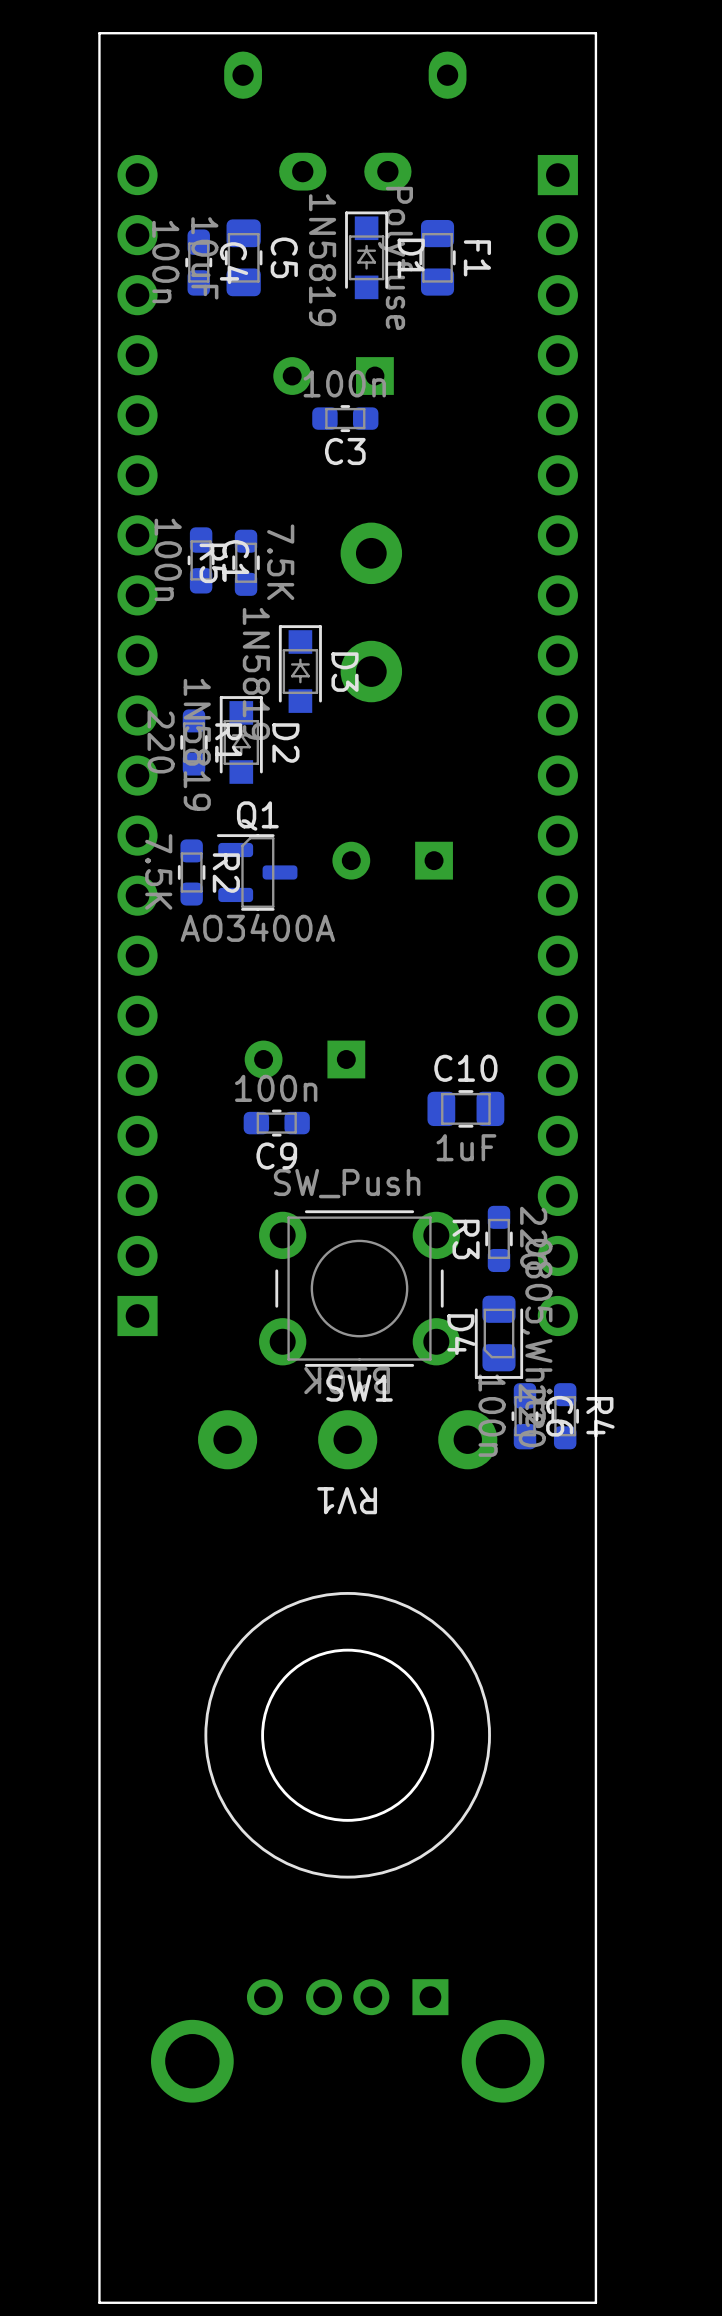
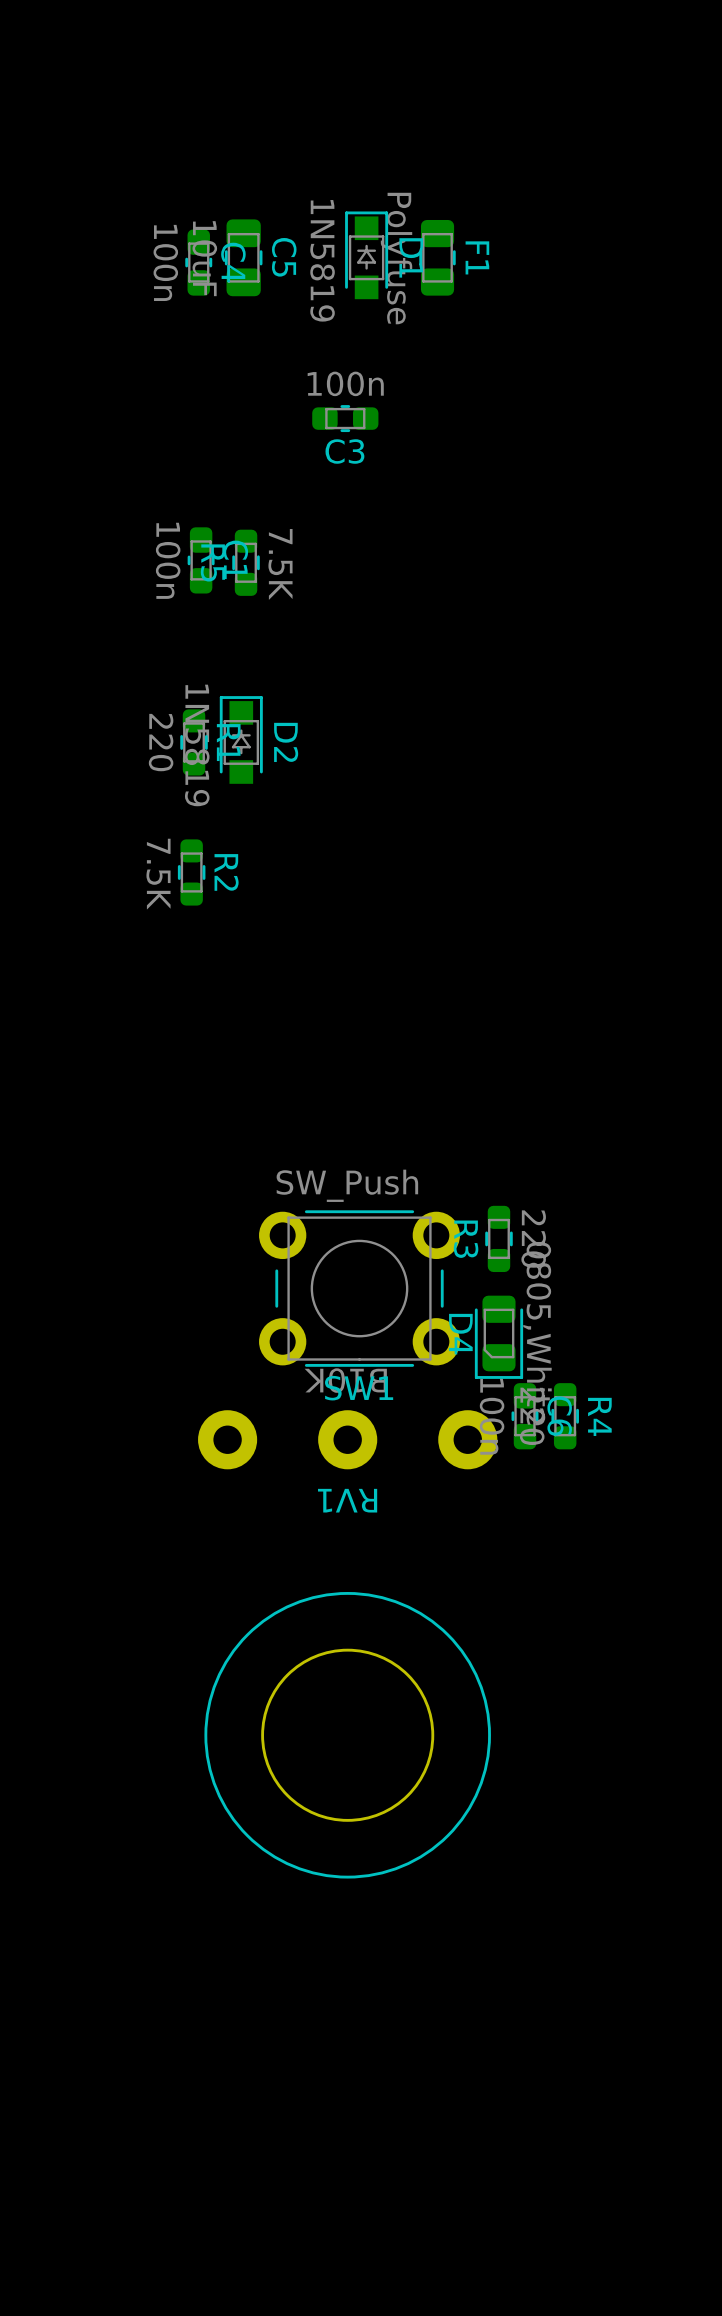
board edge: (595, 33) (99, 33) (99, 2302) (595, 2302) (595, 33) -> none
part: (345, 121) -> none
part: (333, 376) -> none
part: (371, 612) -> none
D3: 1N5819 (300, 669) -> none
part: (137, 745) -> none
part: (557, 745) -> none
part: (392, 860) -> none
Q1: AO3400A (257, 872) -> none
part: (304, 1059) -> none
C10: 1uF (465, 1108) -> none
C9: 100n (276, 1123) -> none
part: (347, 2040) -> none

